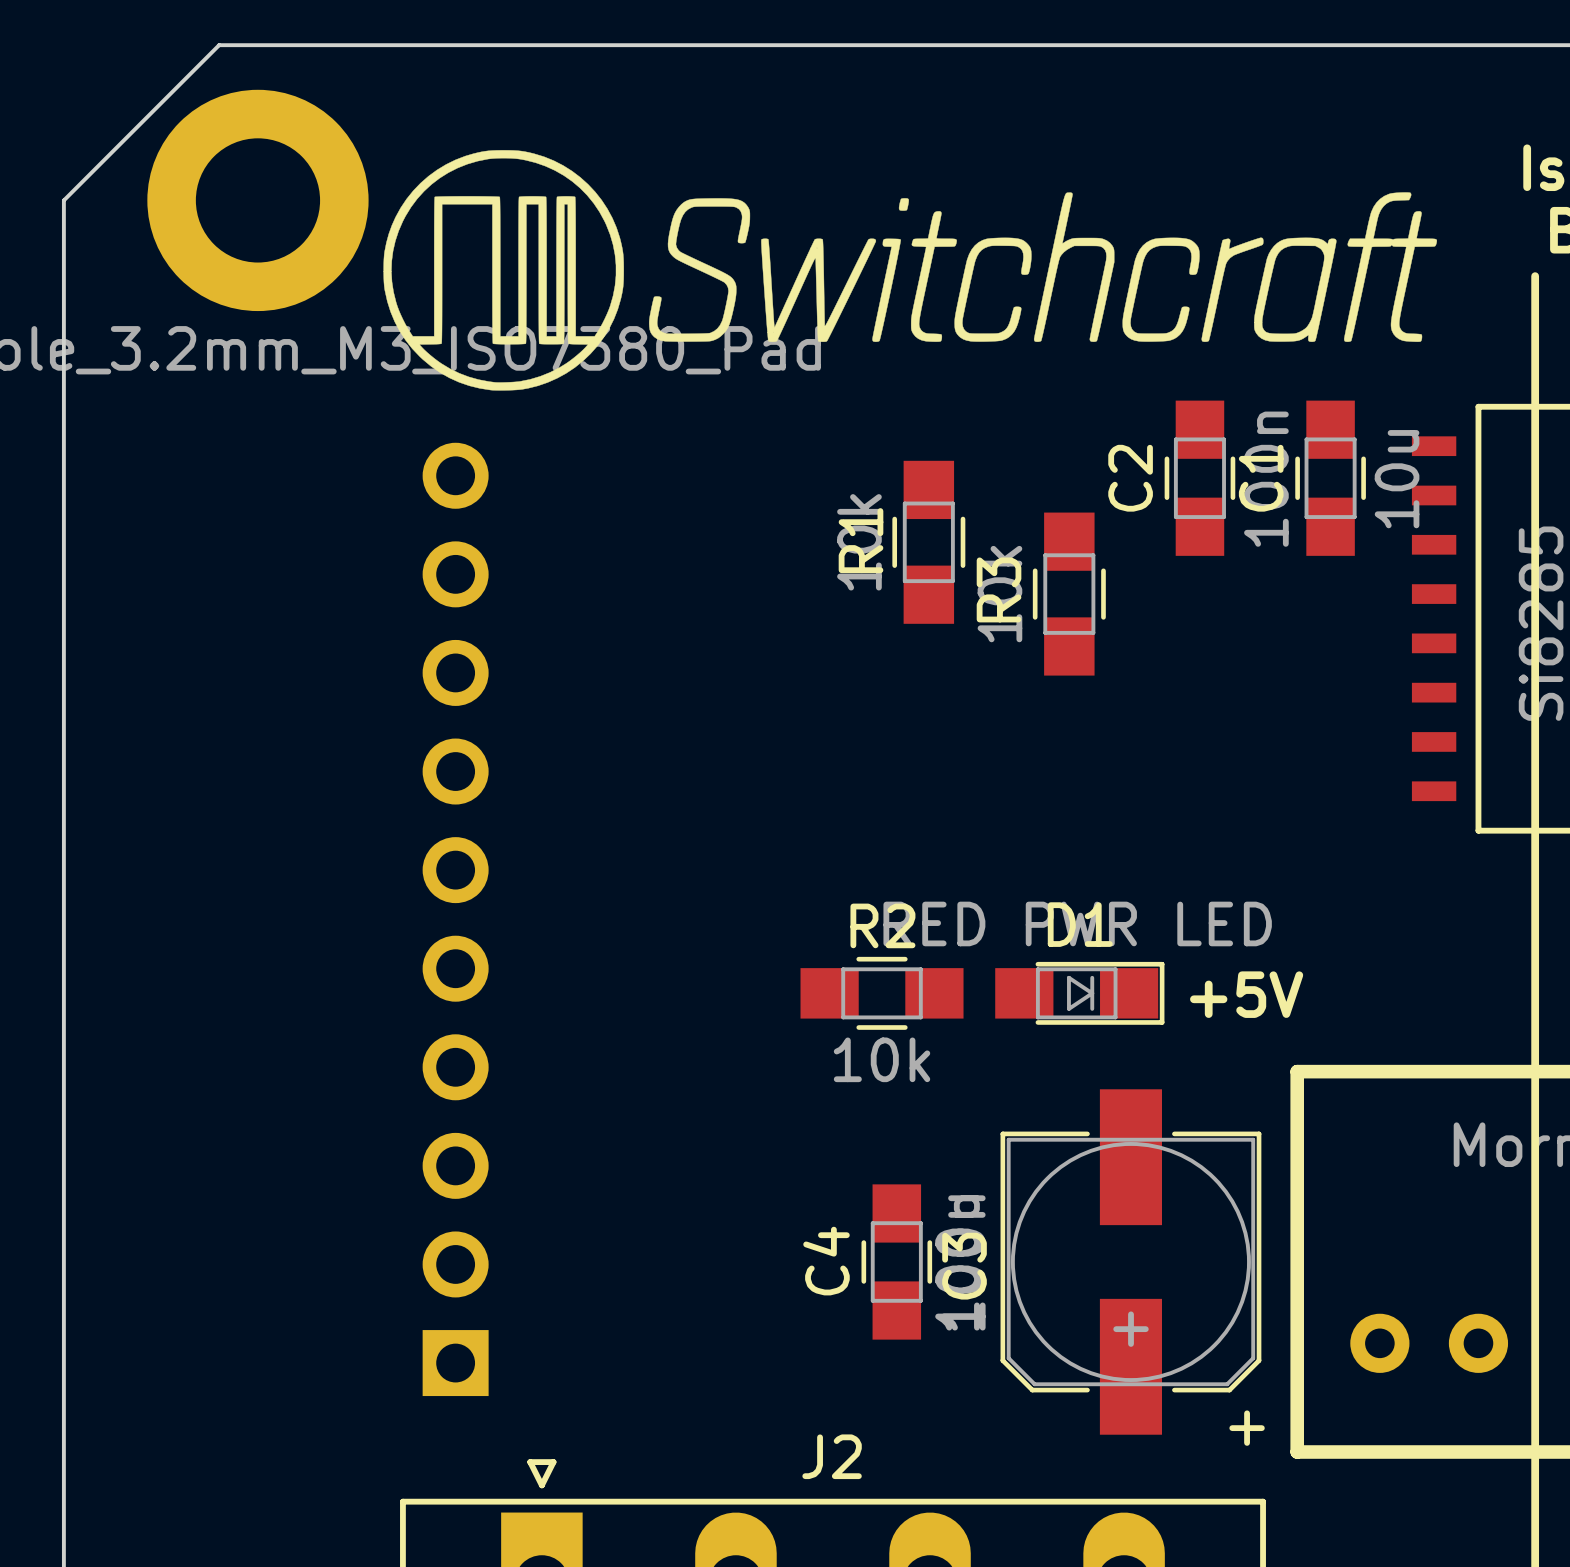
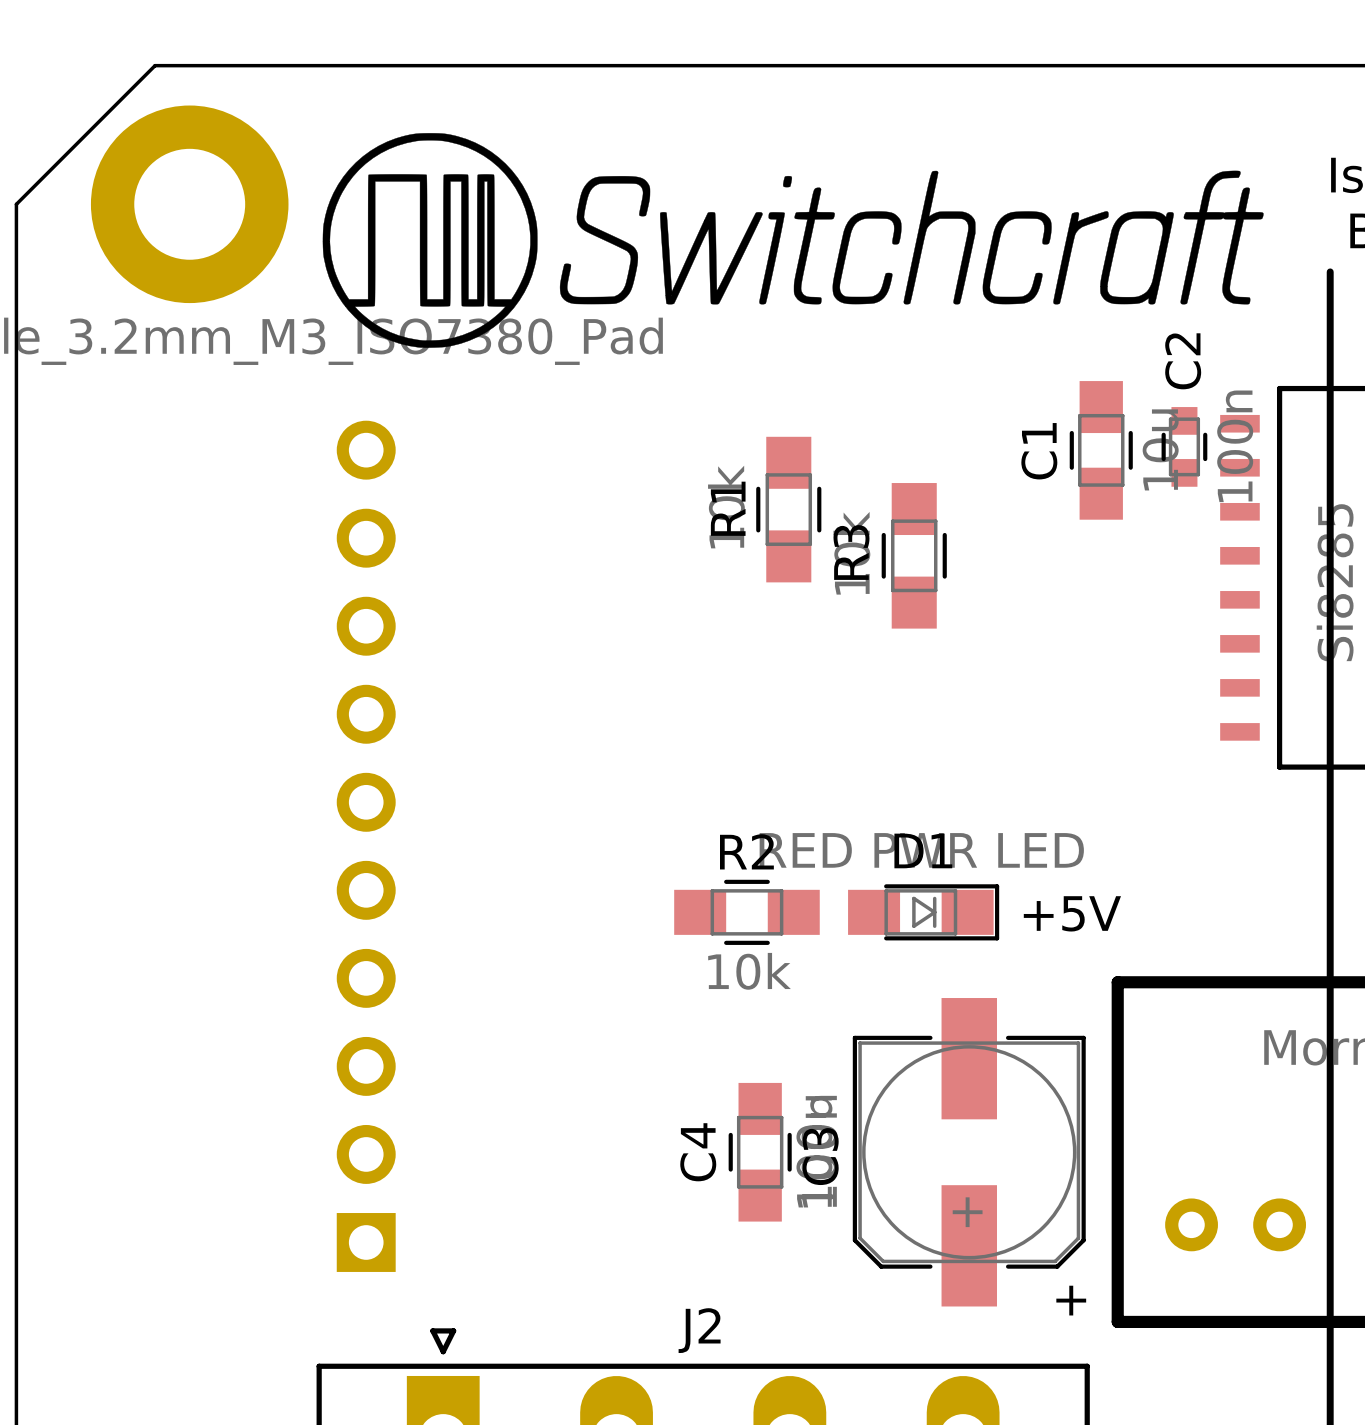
drawing position: (910, 270) -> (793, 240)
C2 footprint: [1164, 400, 1236, 556] -> [1161, 407, 1208, 487]
C2 name position: C2 (1130, 478) -> C2 (1183, 361)
C1 position: (1330, 478) -> (1101, 450)

